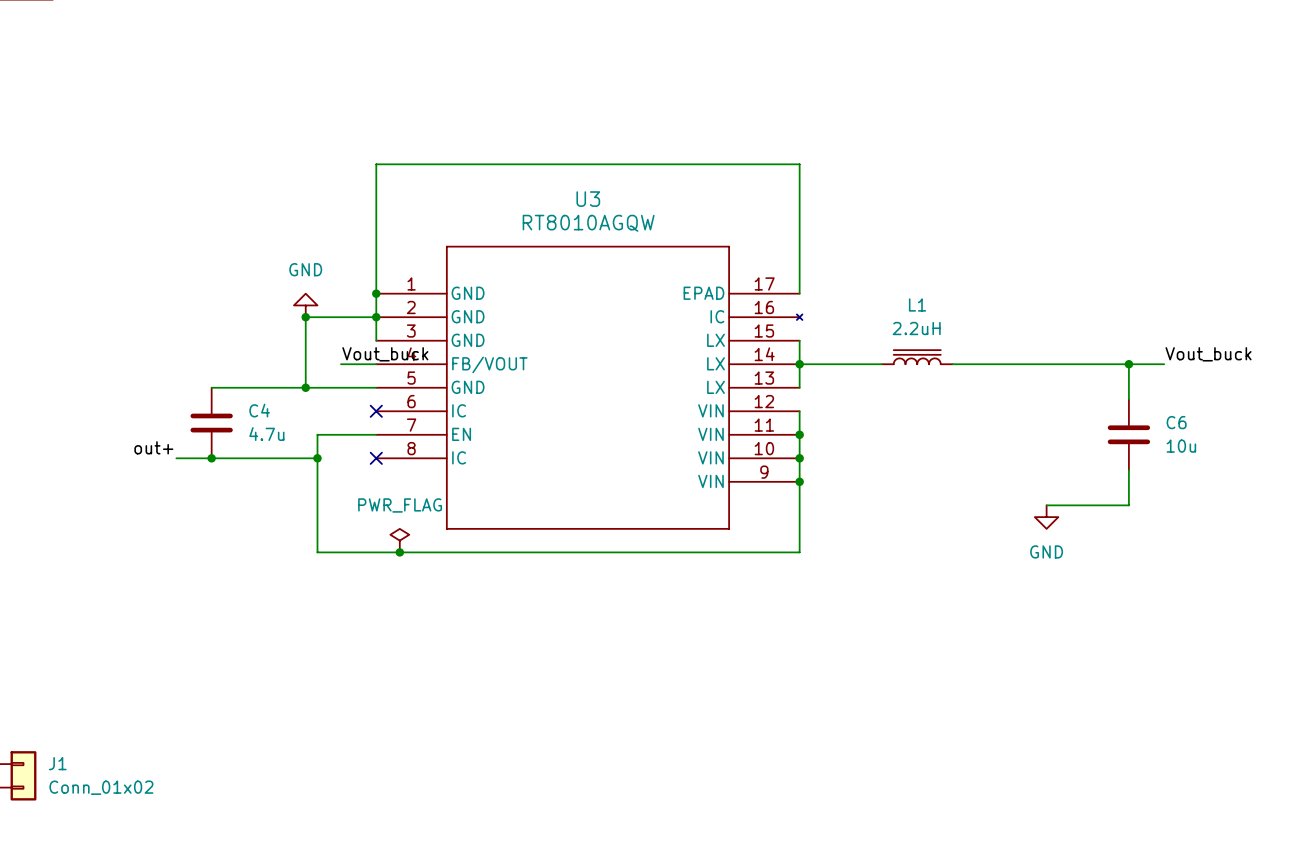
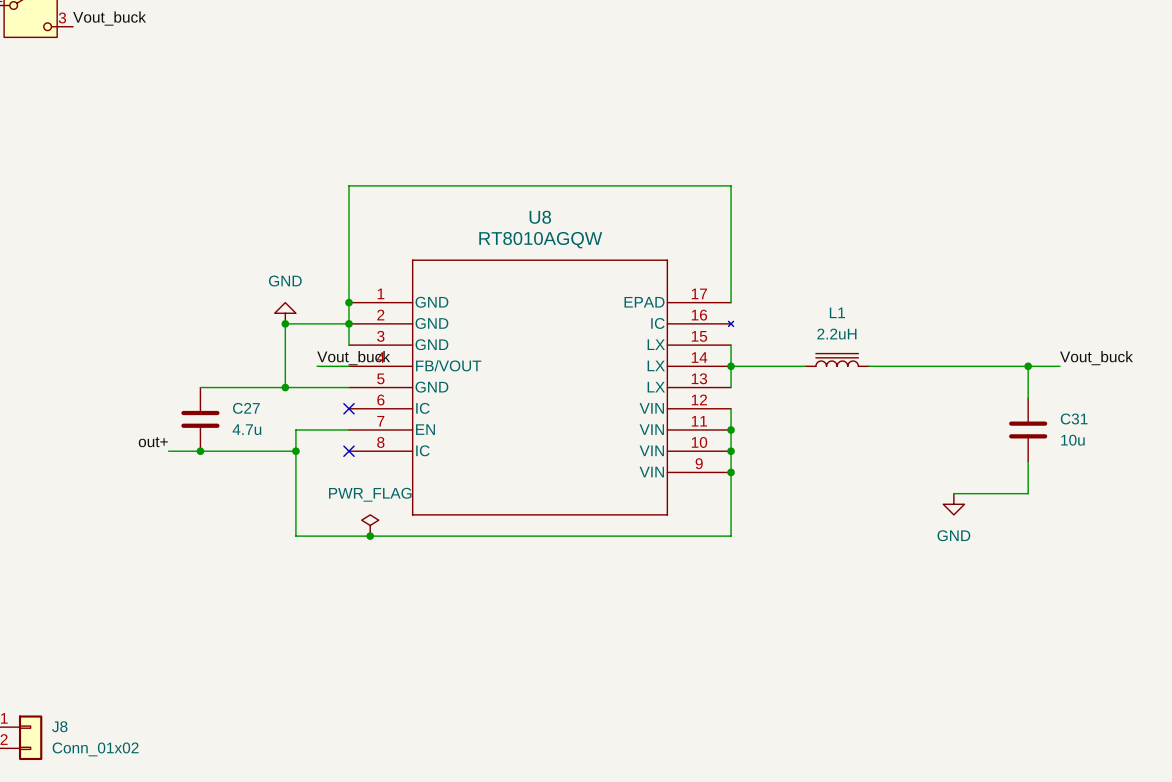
U3 name: U3 (588, 199) -> U8 (540, 217)
C4 name: C4 (259, 410) -> C27 (246, 408)
C6 name: C6 (1176, 422) -> C31 (1074, 418)
J1 name: J1 (57, 763) -> J8 (59, 726)

